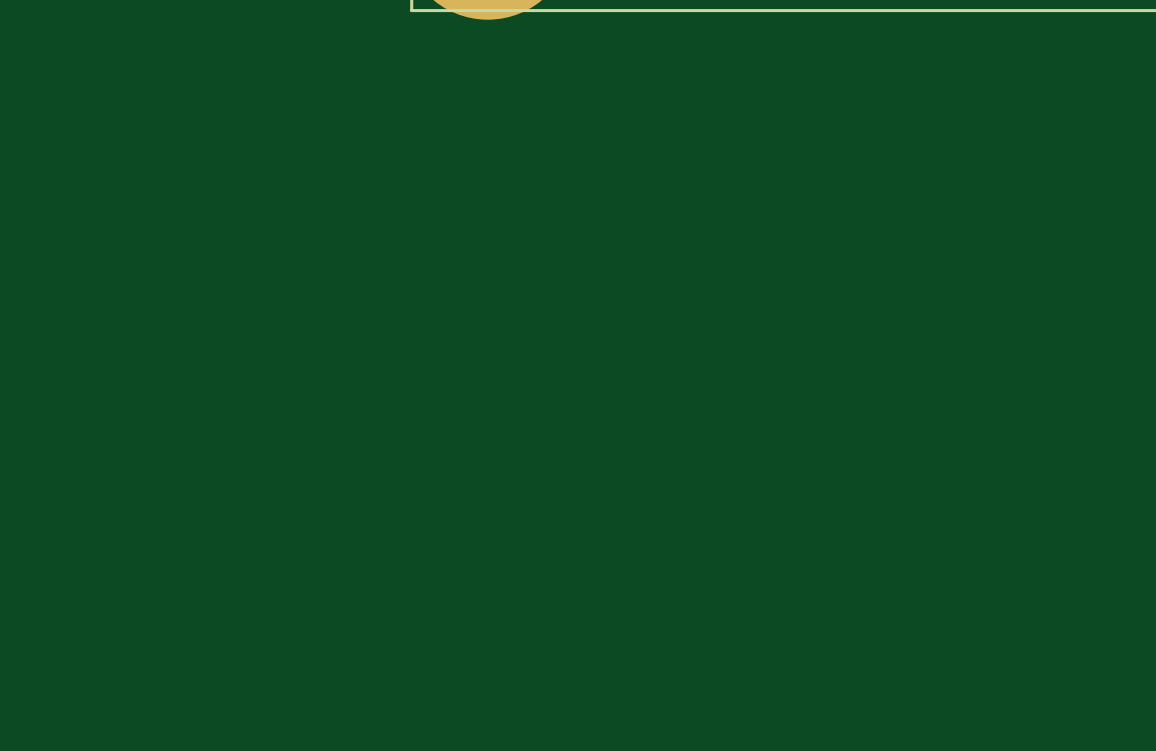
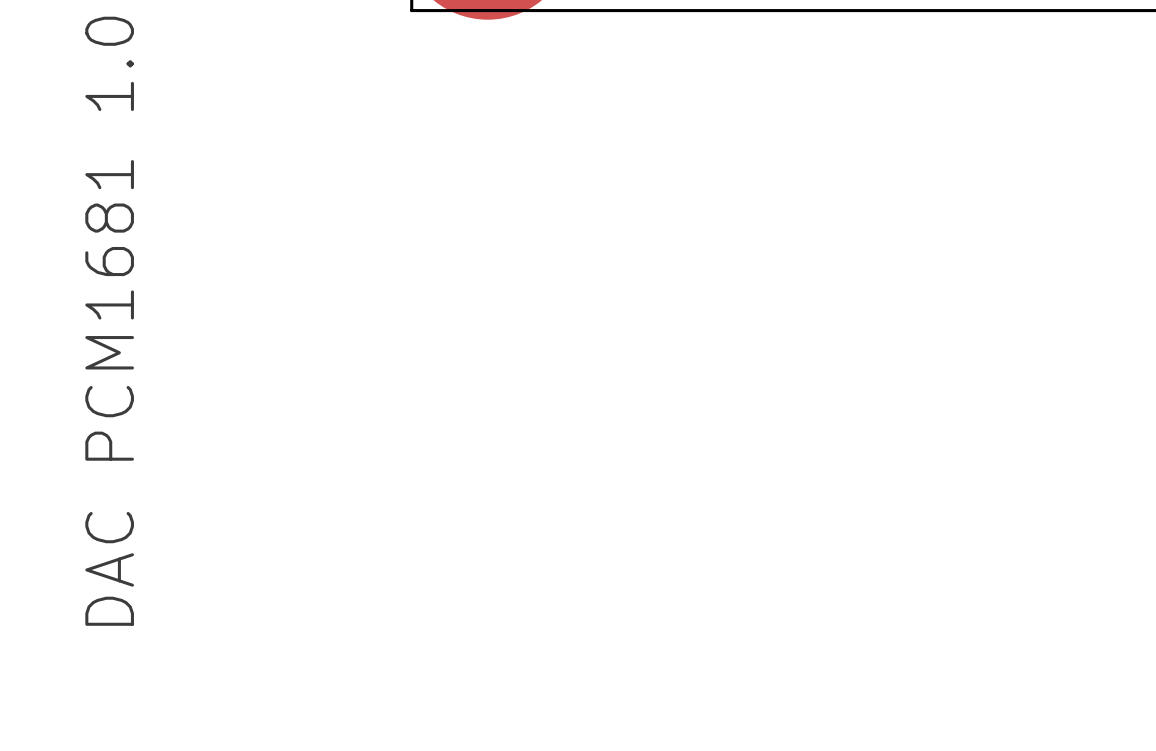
text: none -> DAC PCM1681 1.0 (109, 321)

